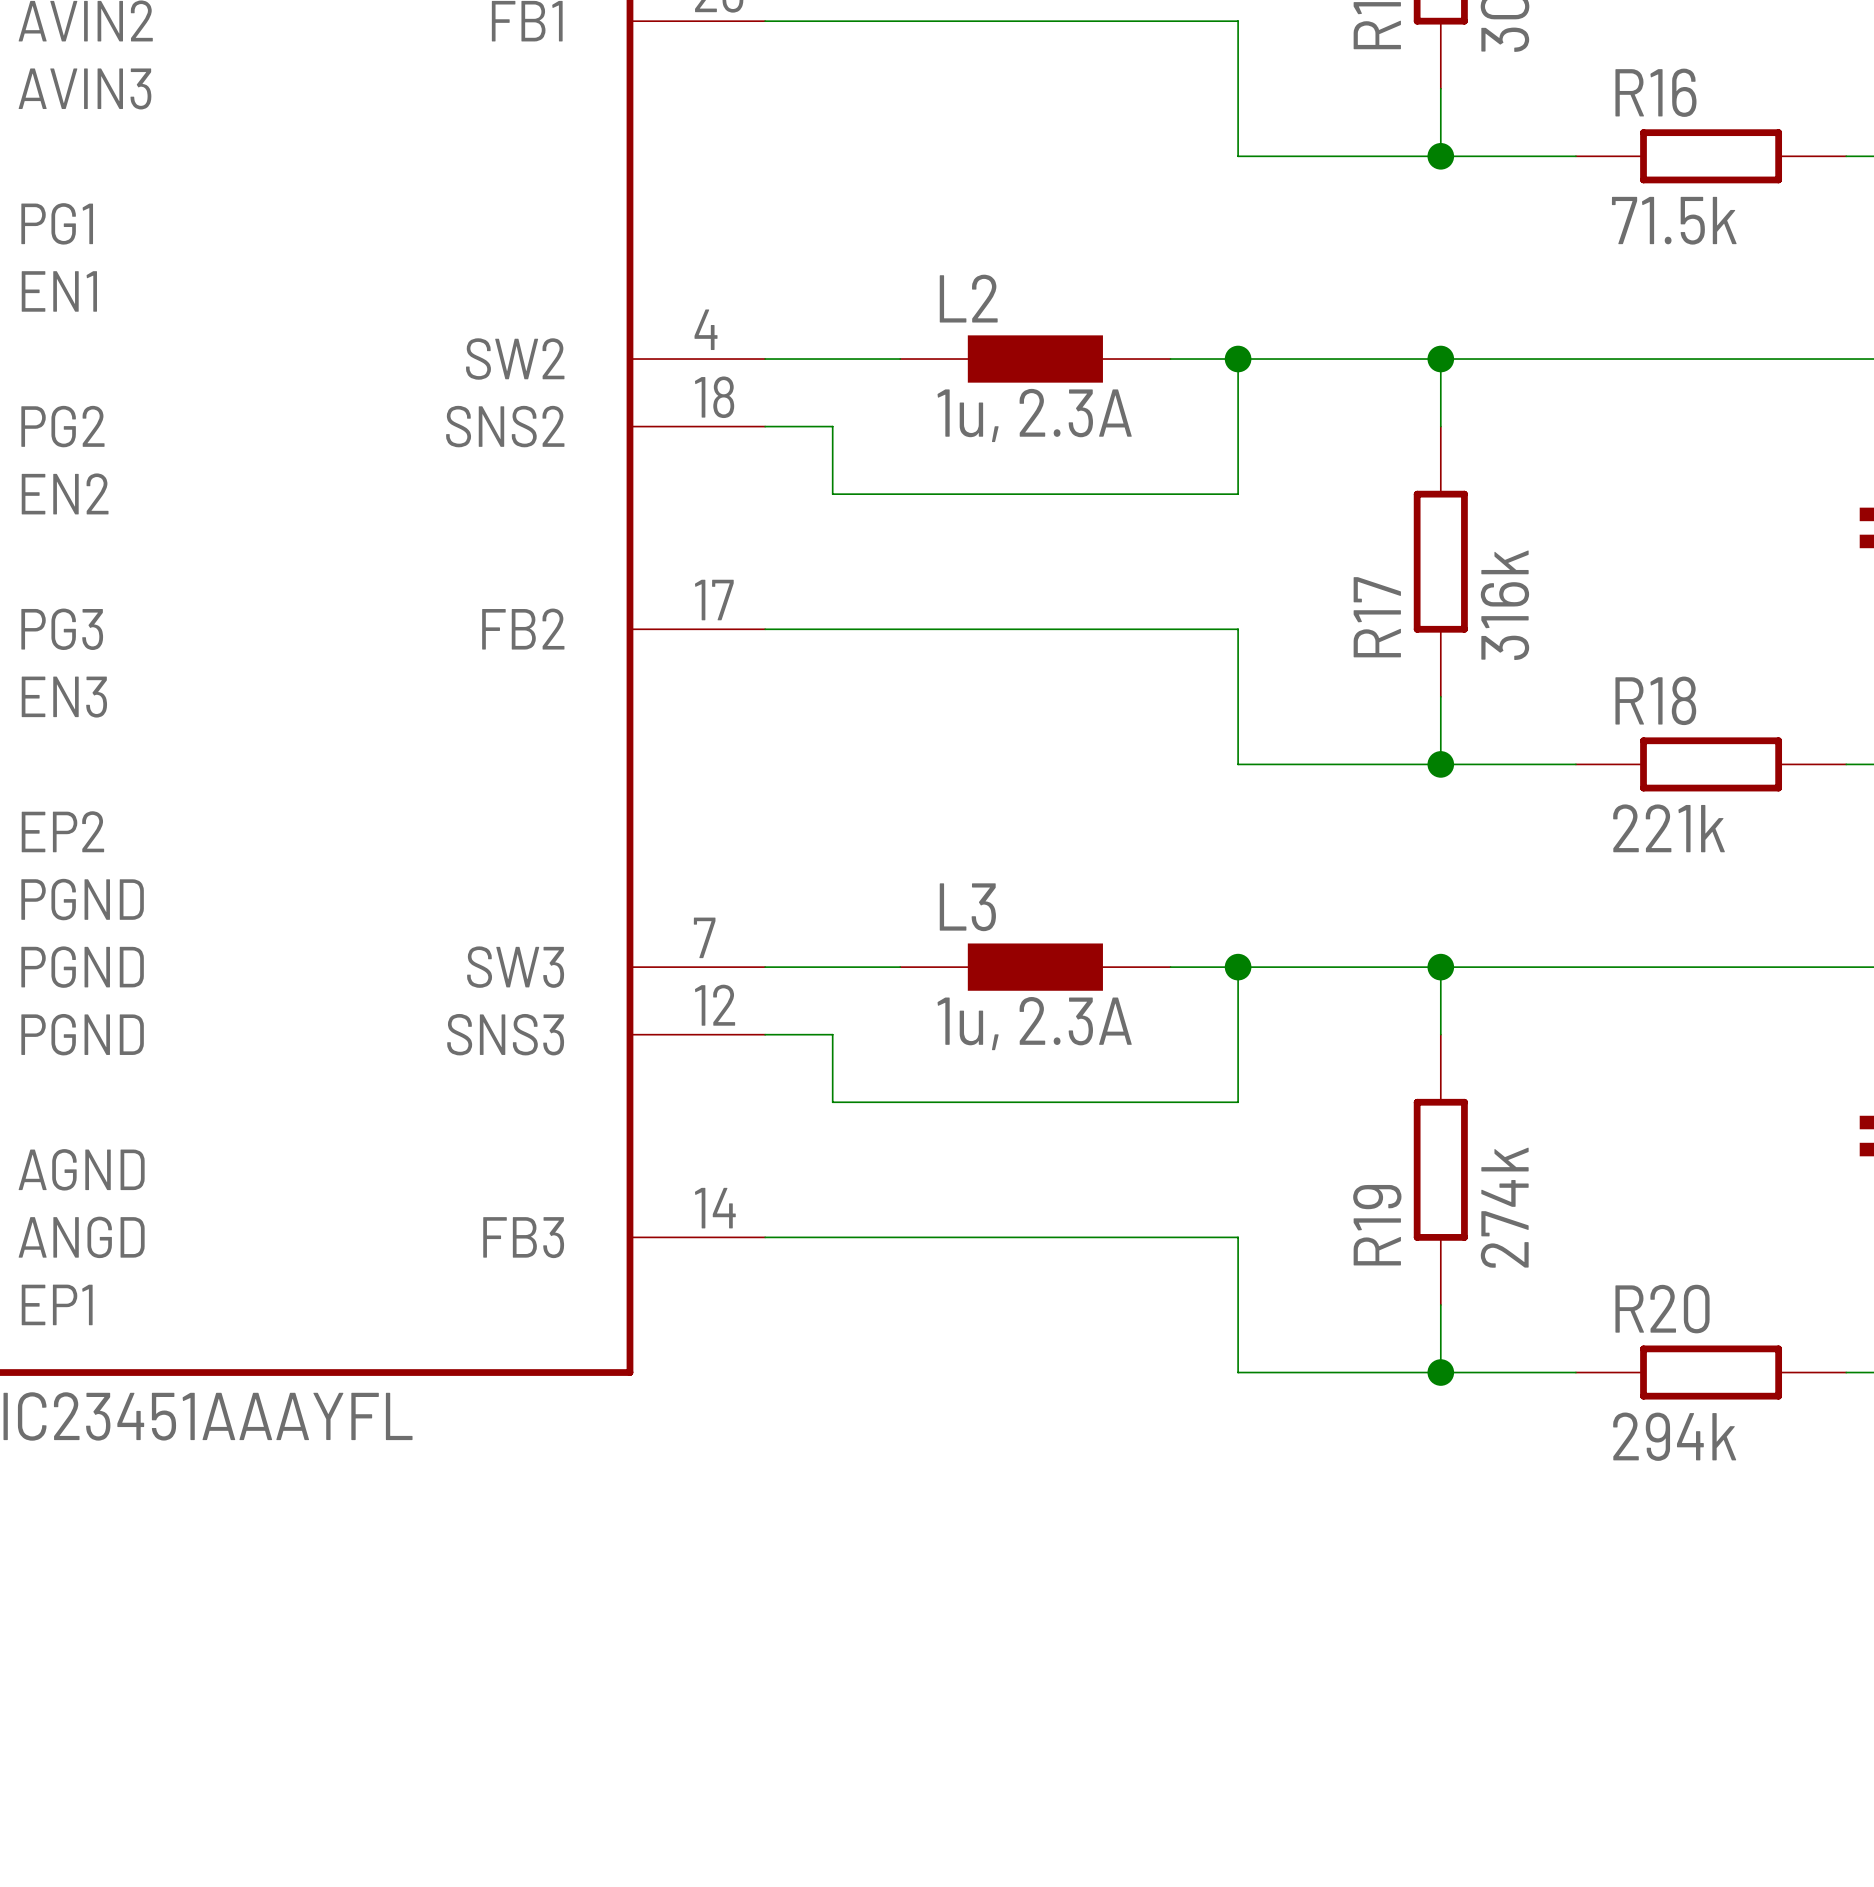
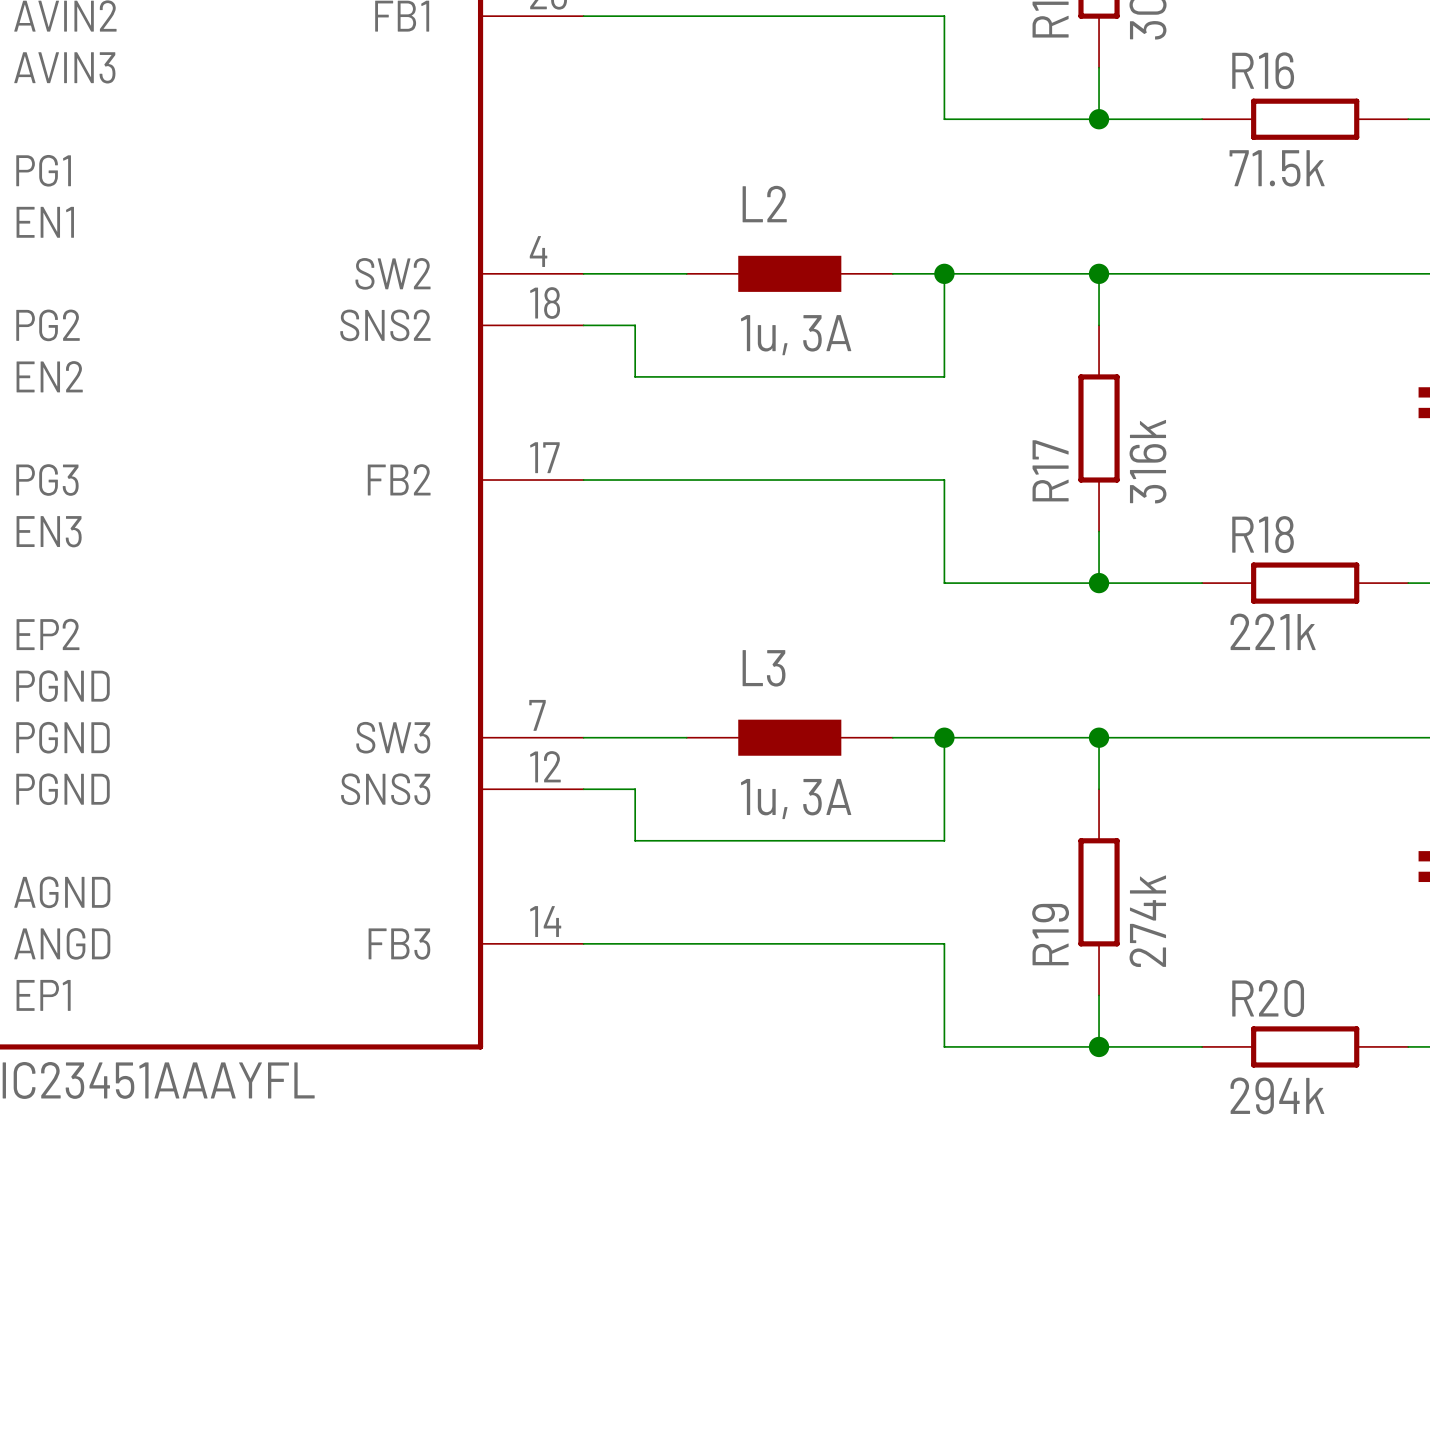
L2 name position: L2 (968, 298) -> L2 (764, 204)
L2 value: 1u, 2.3A (1034, 415) -> 1u, 3A (796, 335)
L3 name position: L3 (967, 907) -> L3 (764, 668)
L3 value: 1u, 2.3A (1034, 1023) -> 1u, 3A (796, 799)

